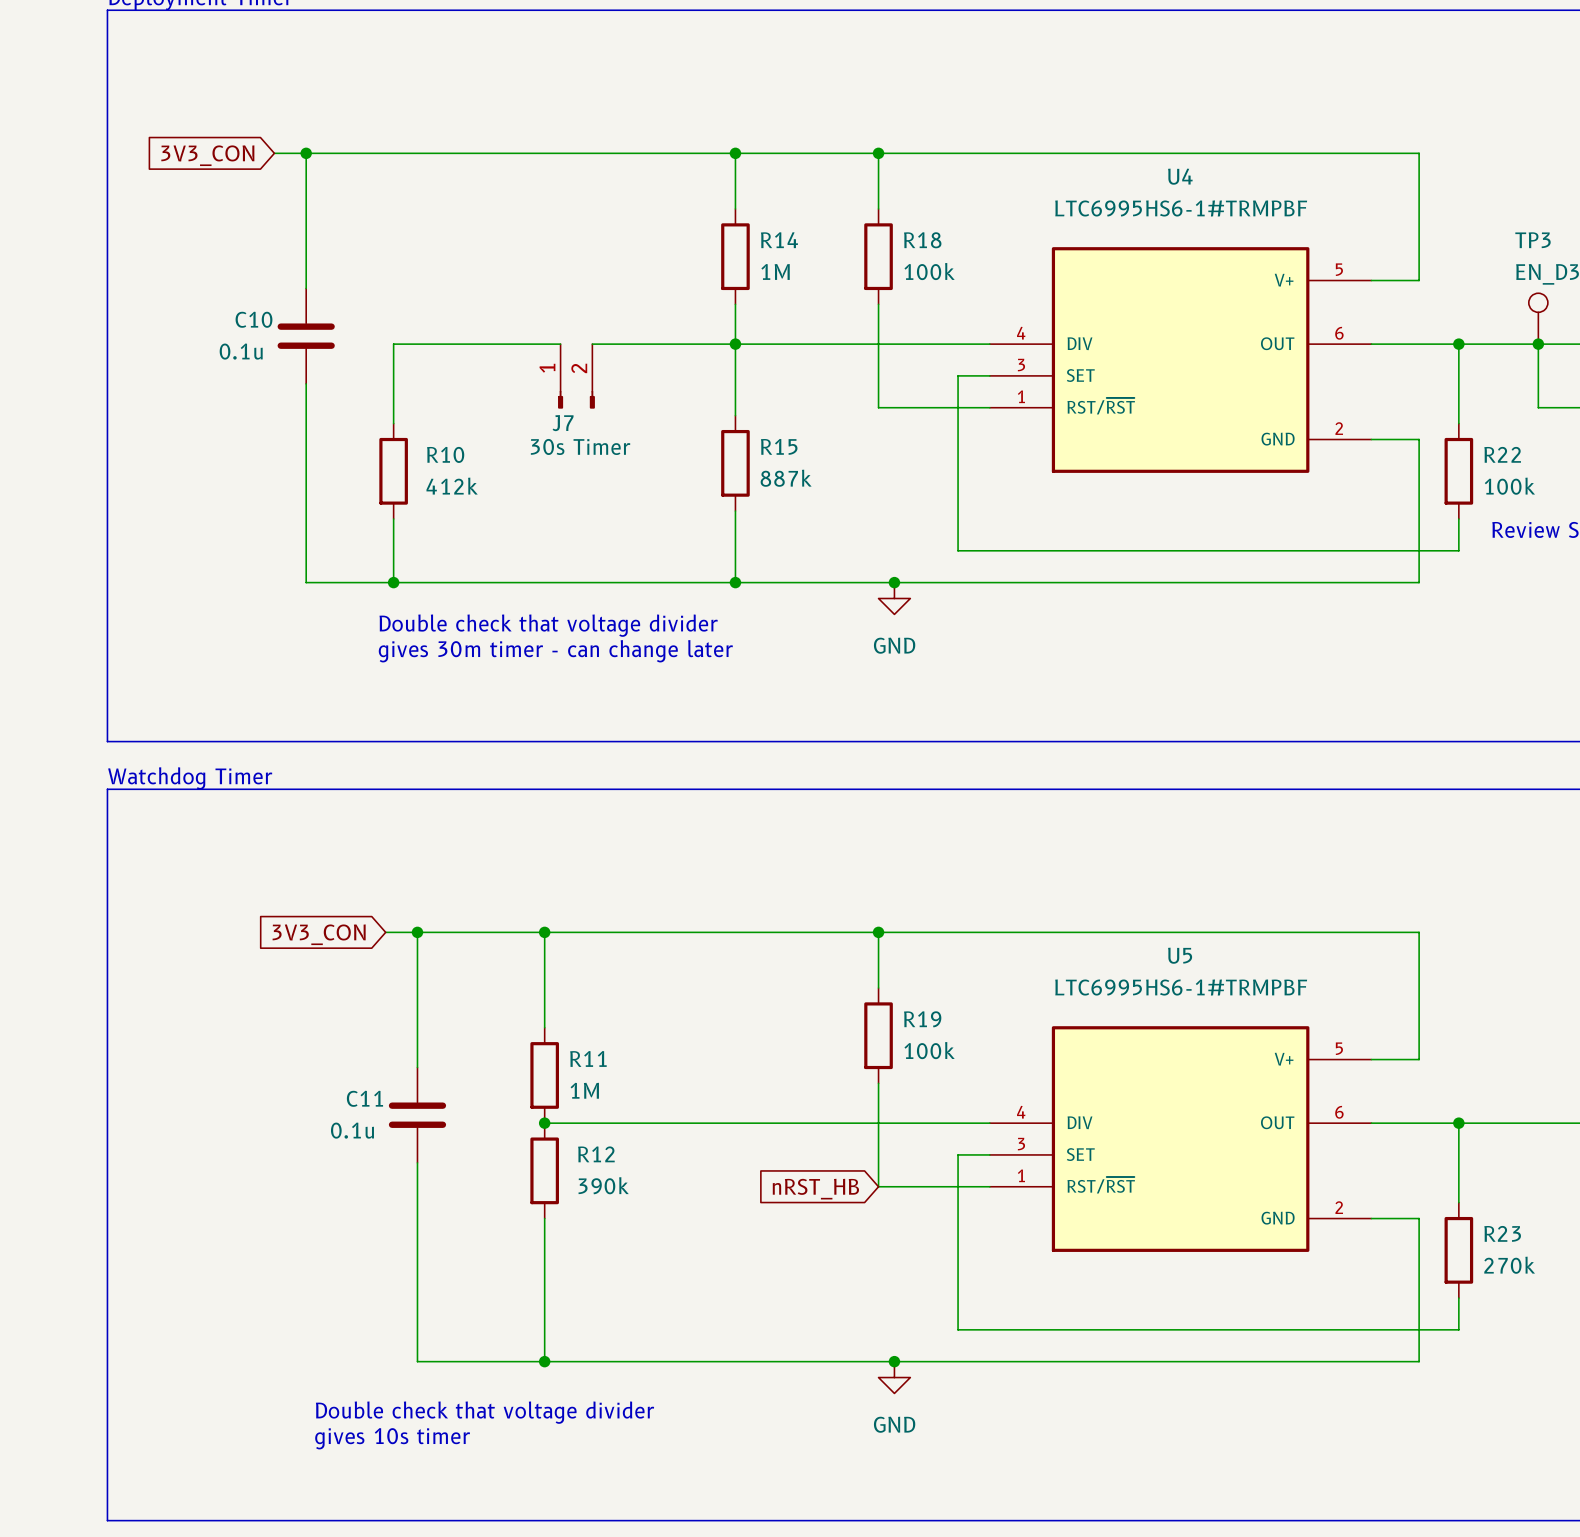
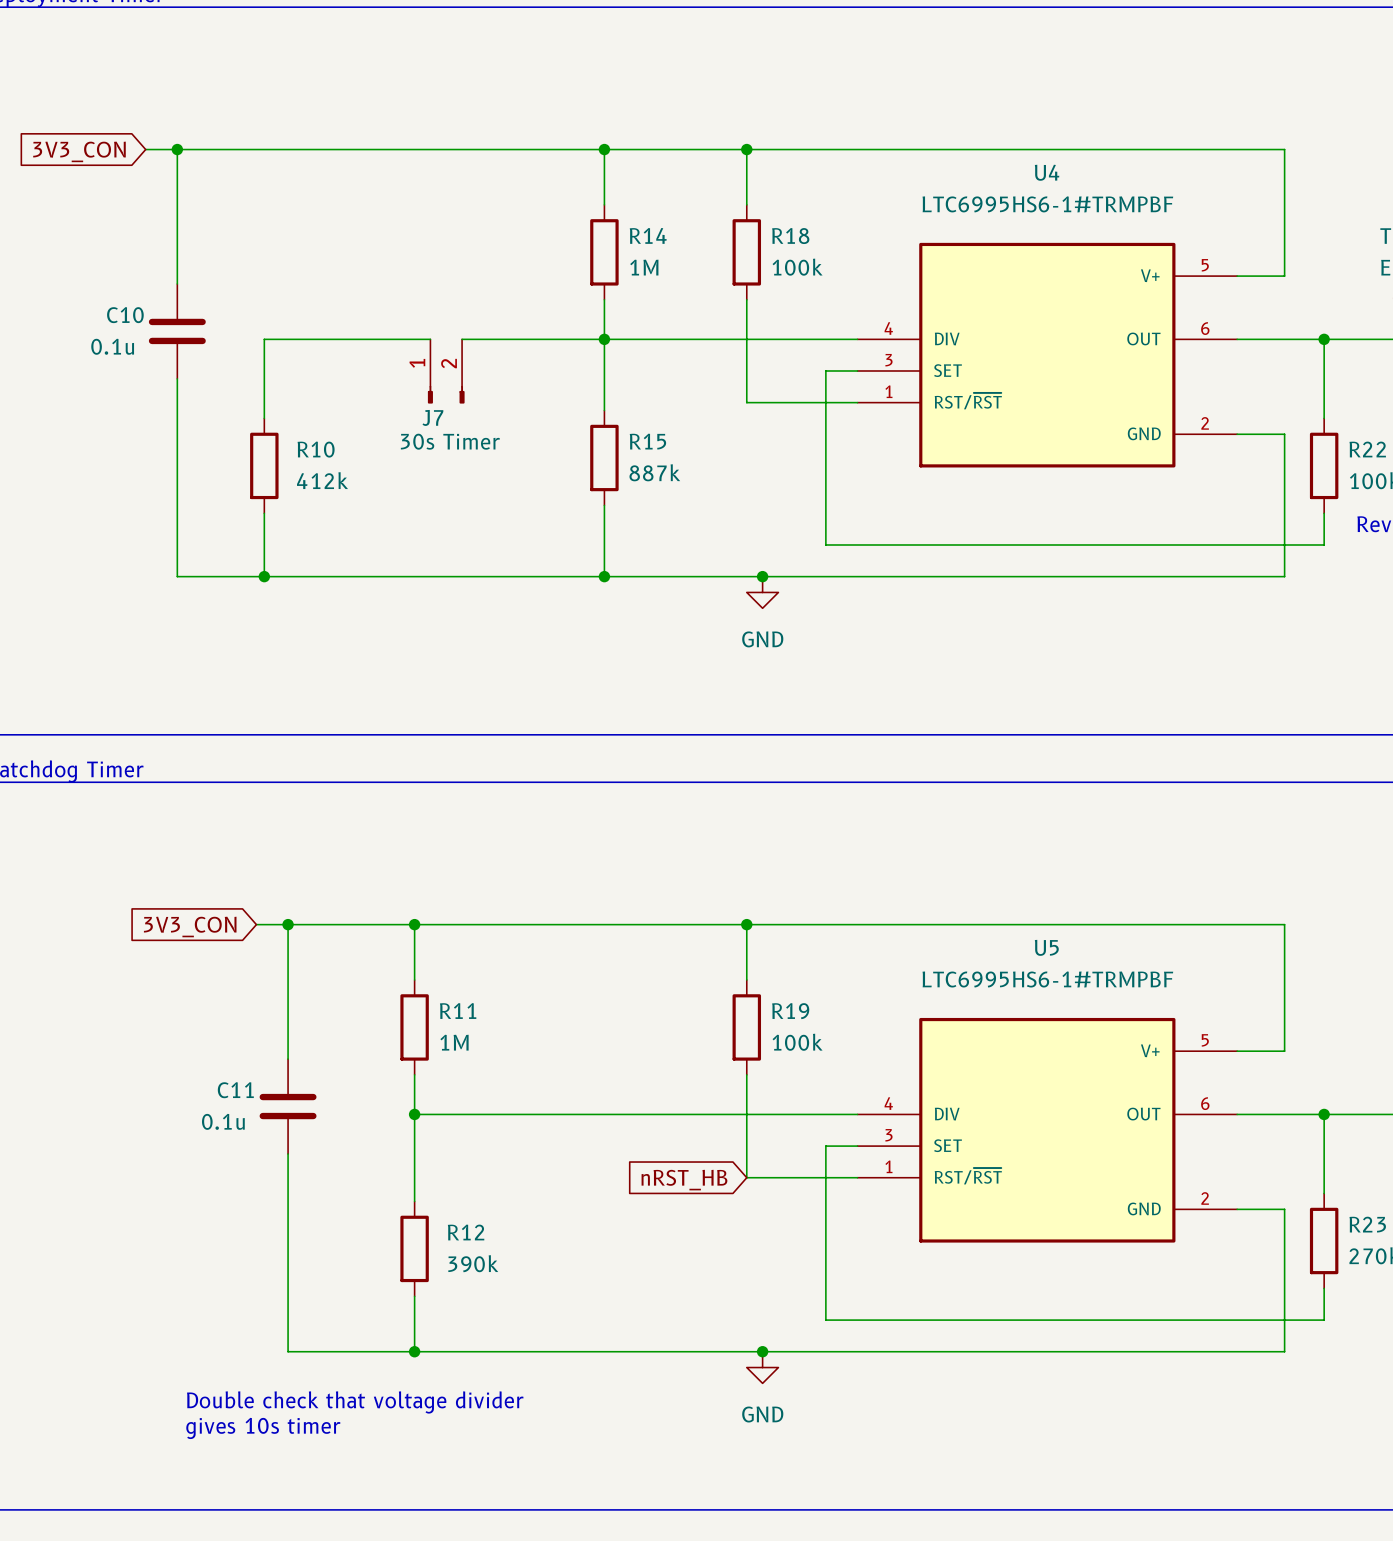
text: Double check that voltage divider (548, 625) -> none
text: gives 30m timer - can change later (555, 651) -> none
wire: (544, 988) (544, 1027) -> none
R11 position: (544, 1075) -> (414, 1027)
wire: none -> (414, 1074) (414, 1201)
R12 position: (544, 1170) -> (414, 1248)
wire: (544, 1218) (544, 1306) -> none

